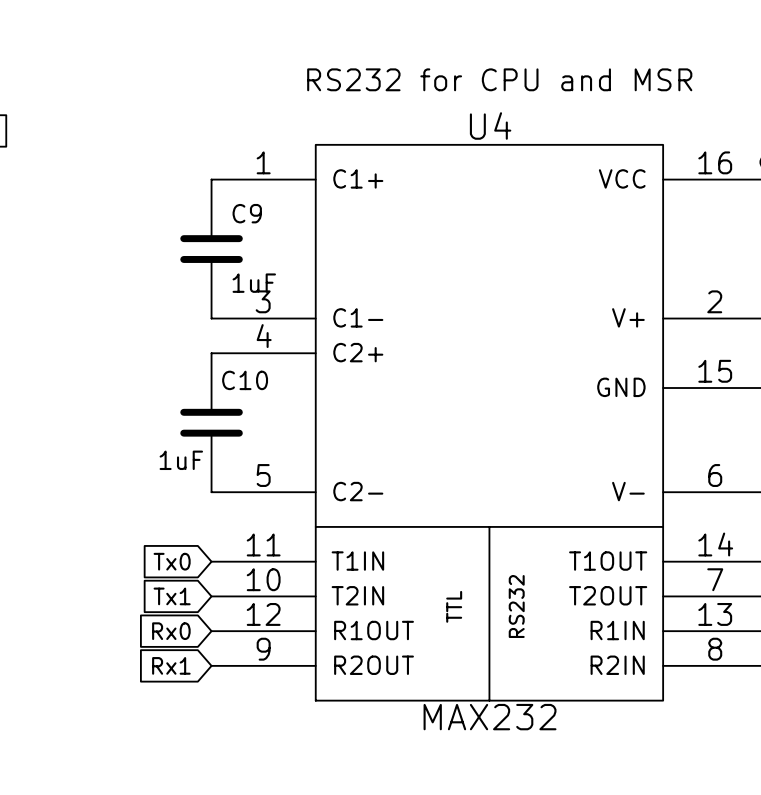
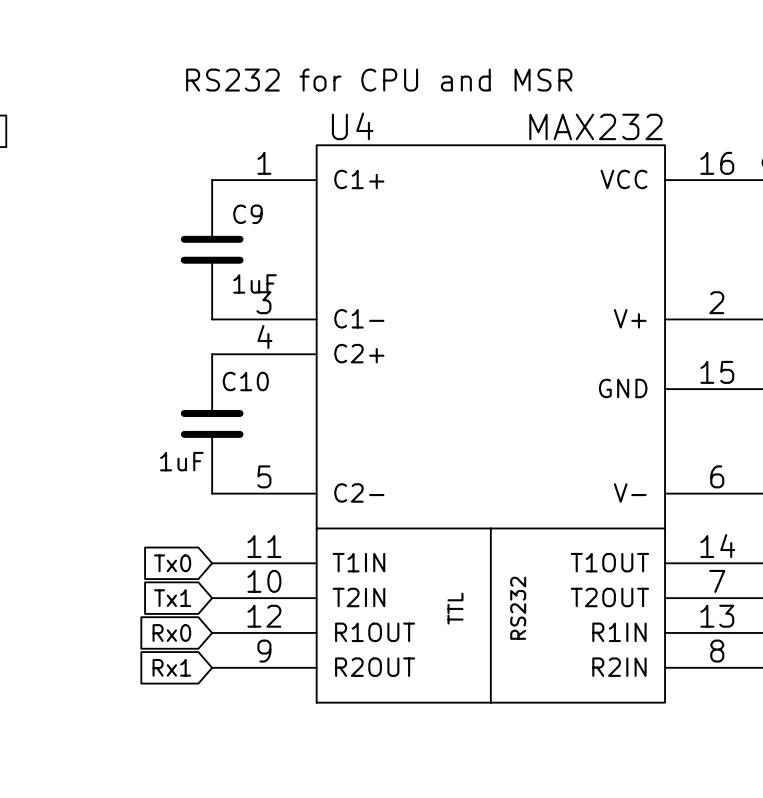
text position: RS232 for CPU and MSR (499, 79) -> RS232 for CPU and MSR (379, 80)
U4 name position: U4 (490, 125) -> U4 (352, 126)
U4 value position: MAX232 (490, 717) -> MAX232 (595, 126)

